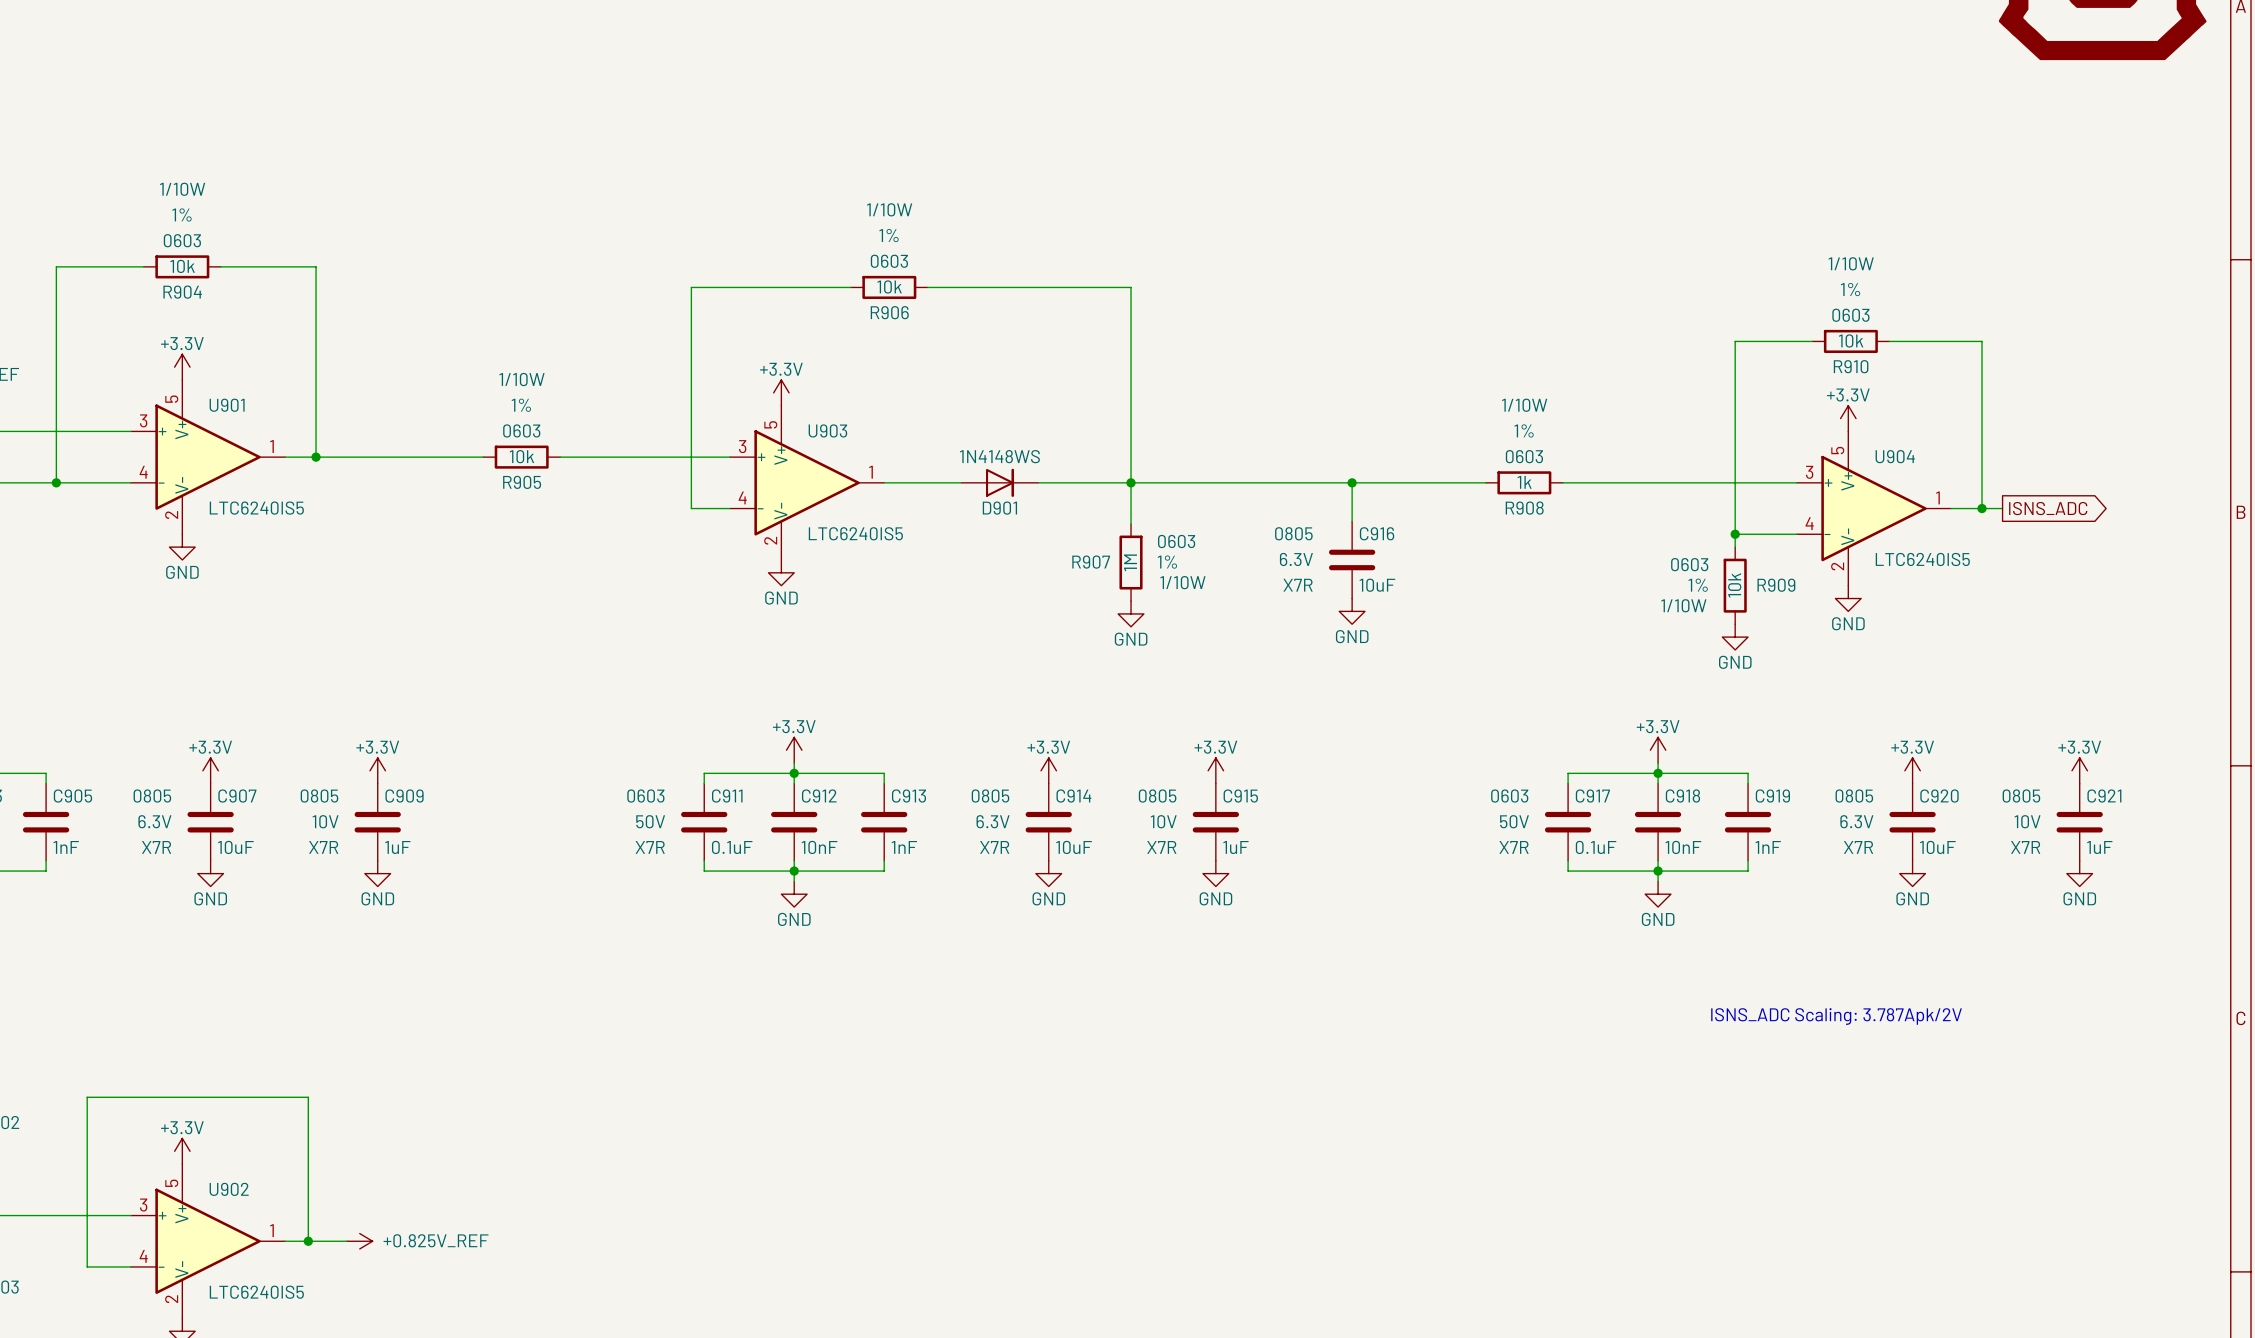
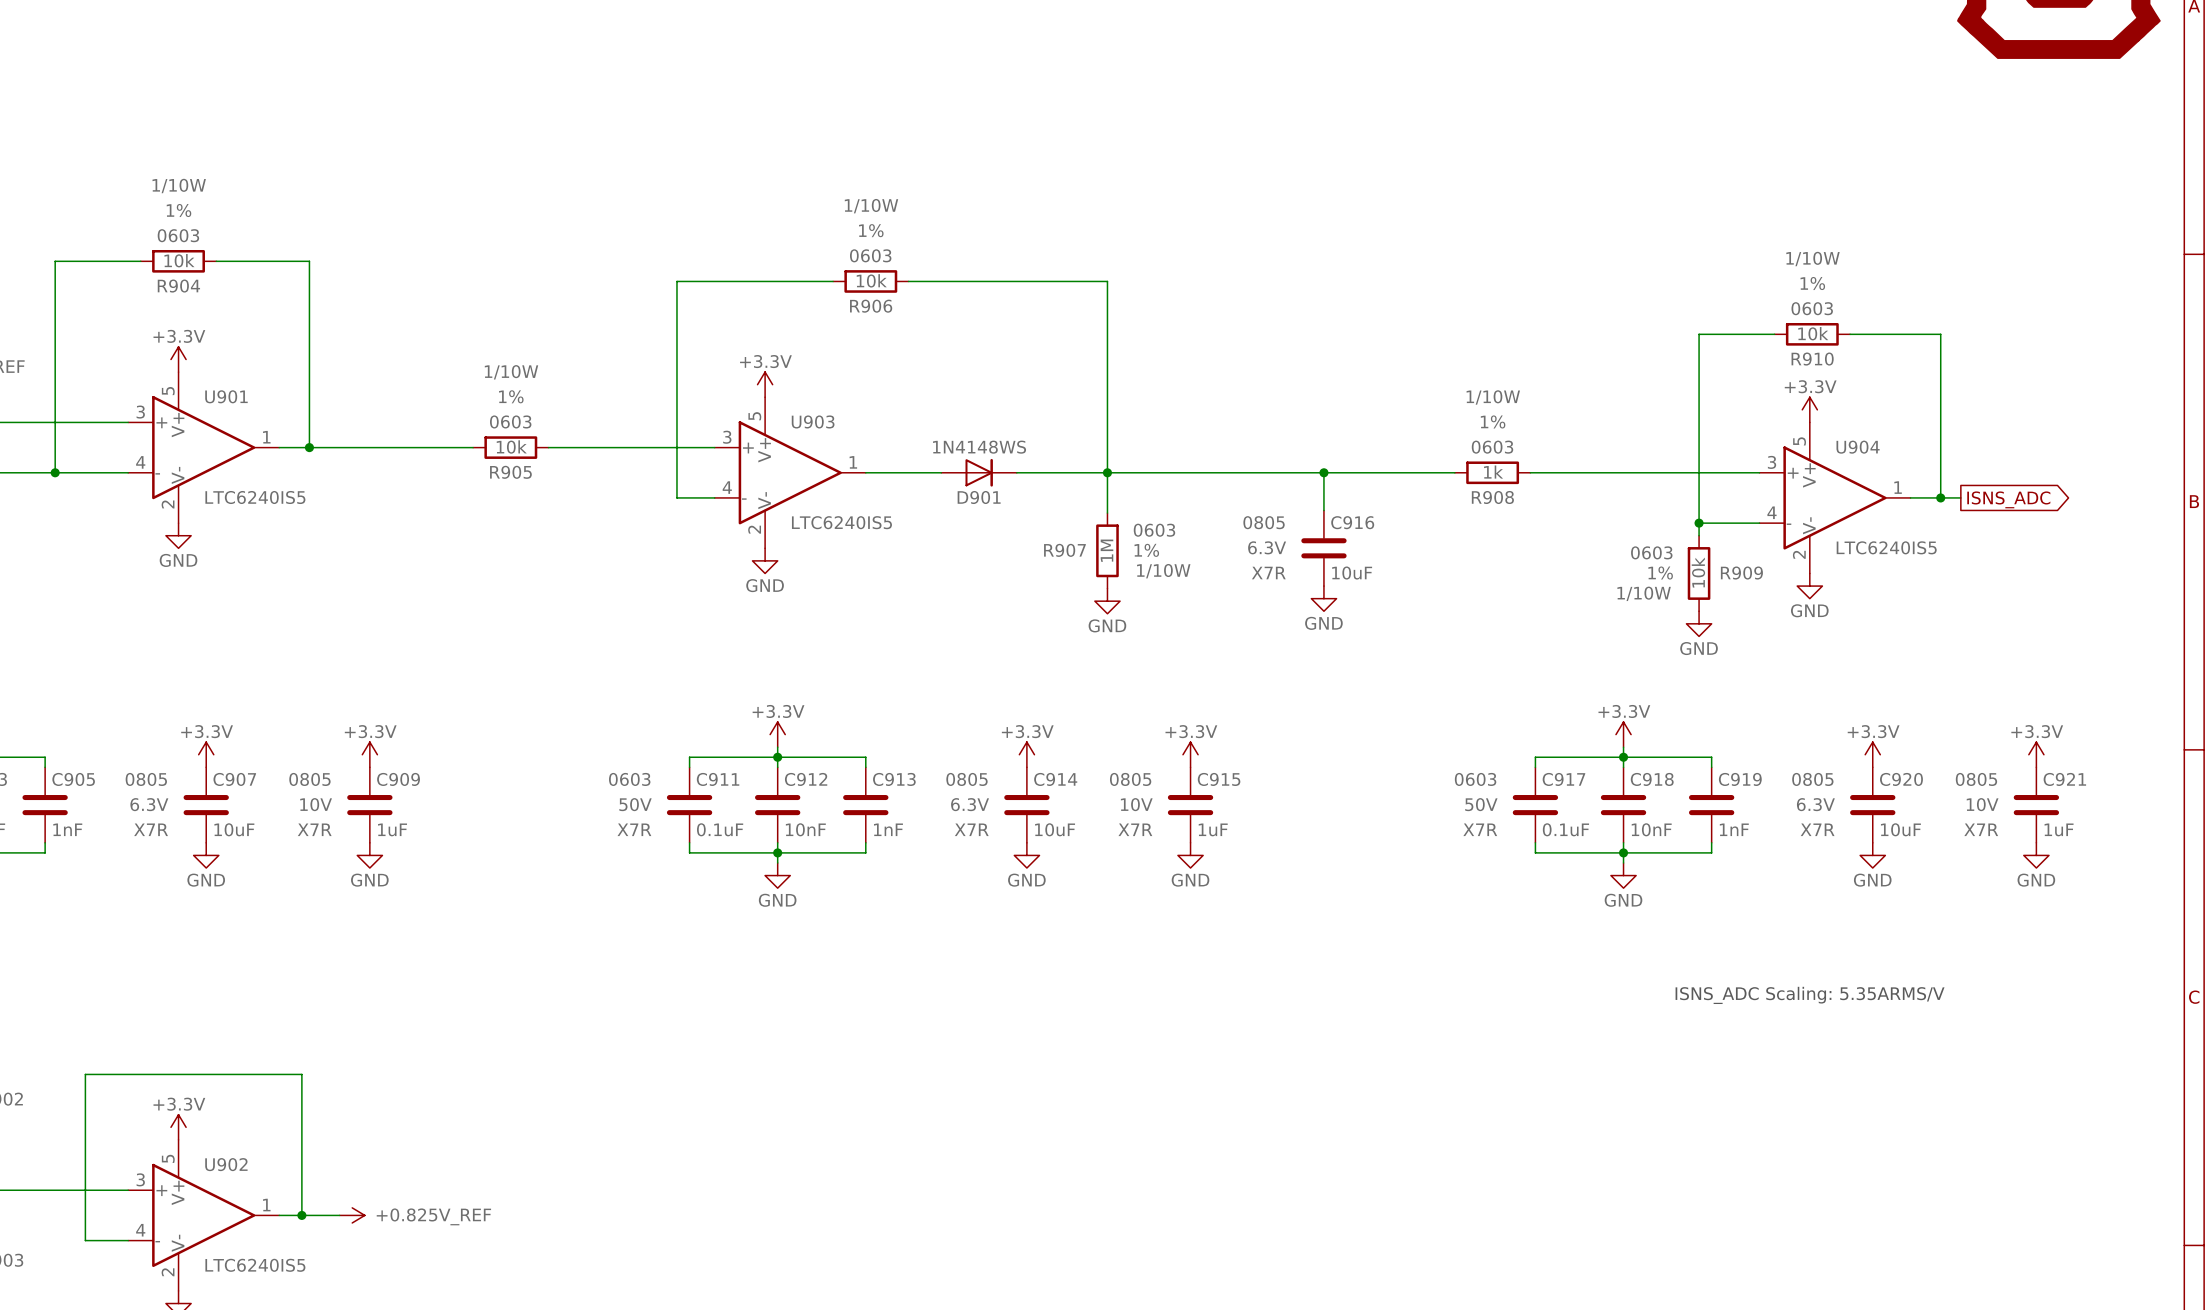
text: ISNS_ADC Scaling: 3.787Apk/2V (1836, 1016) -> ISNS_ADC Scaling: 5.35ARMS/V (1810, 995)

